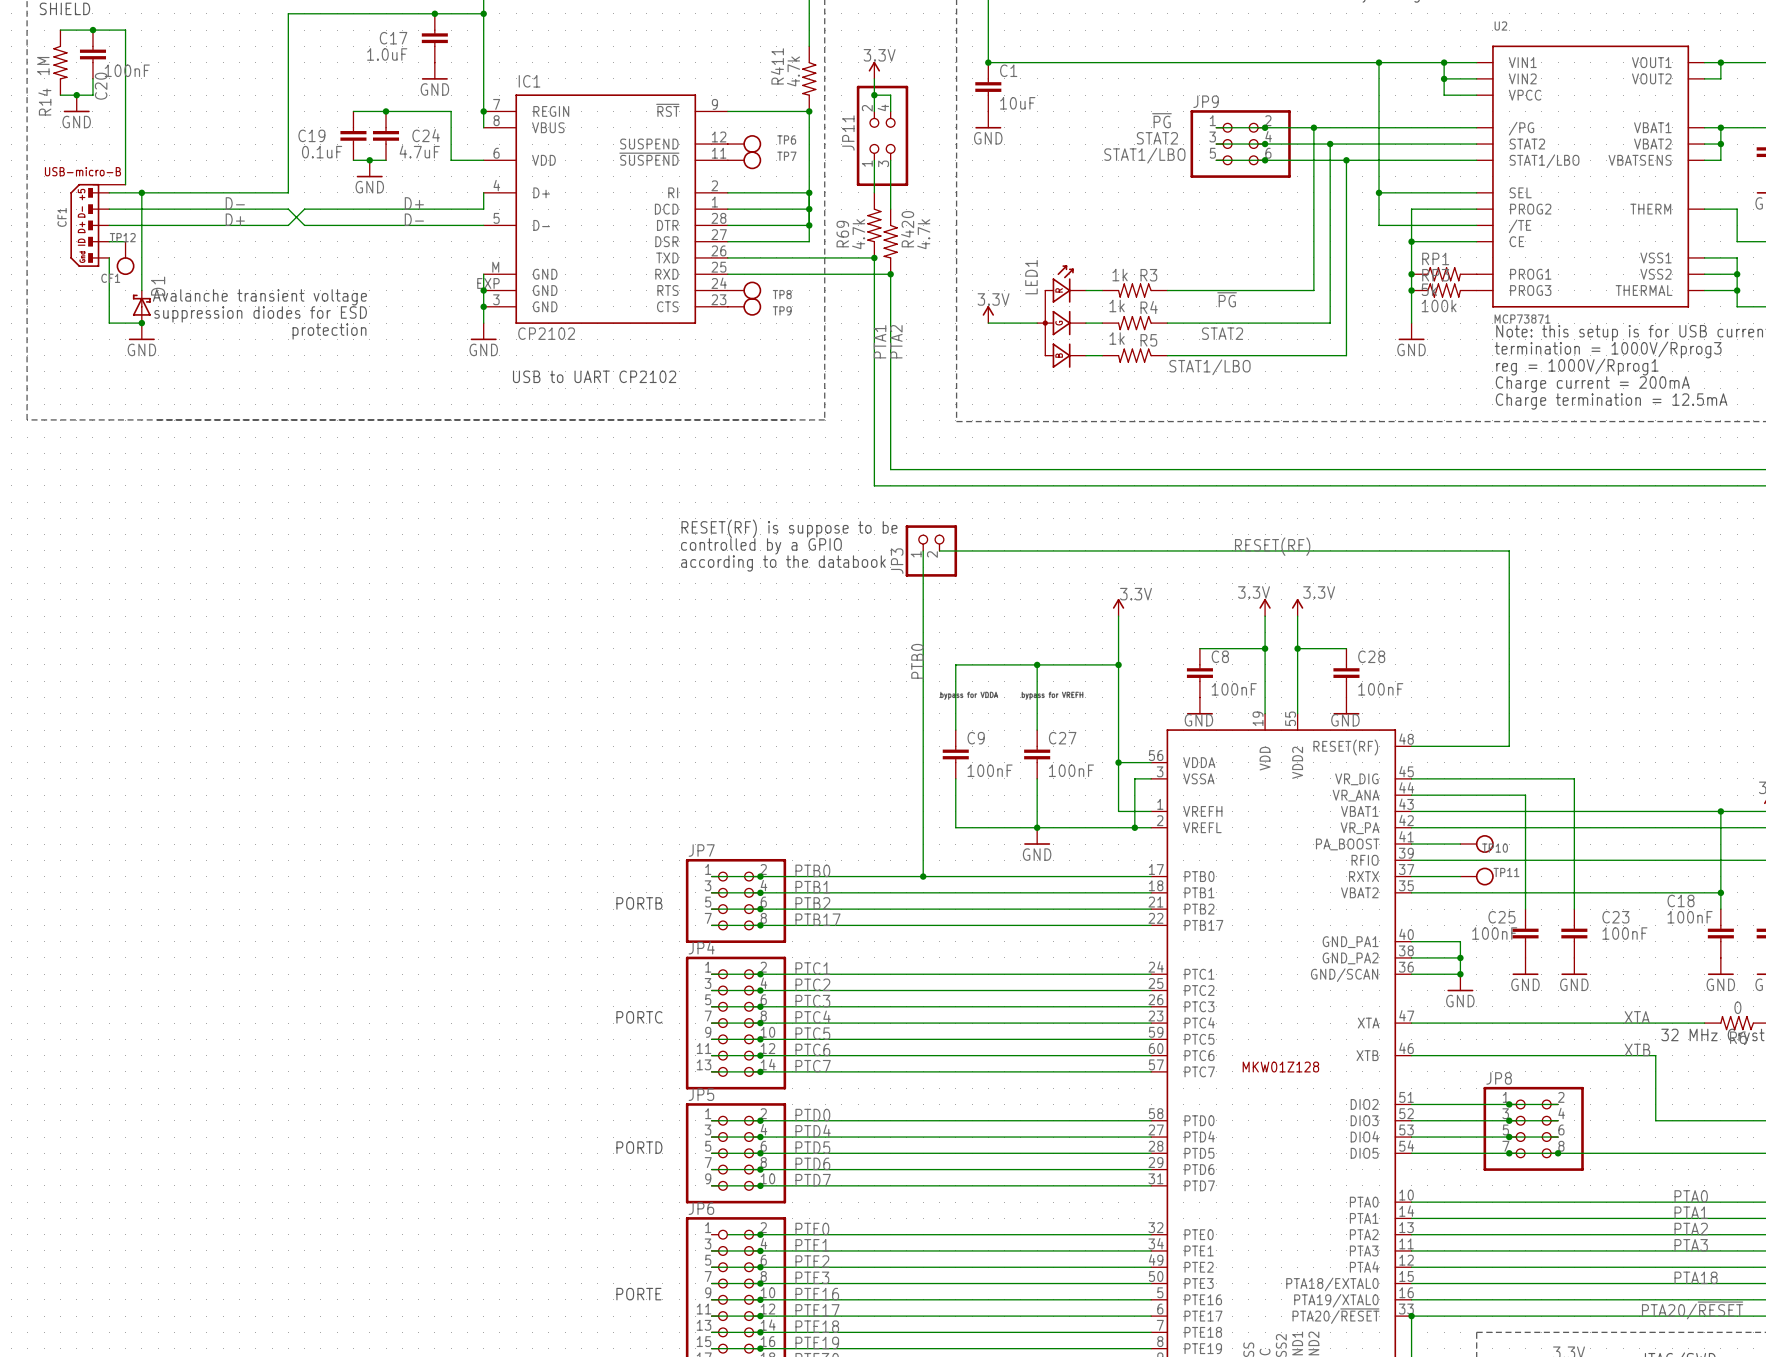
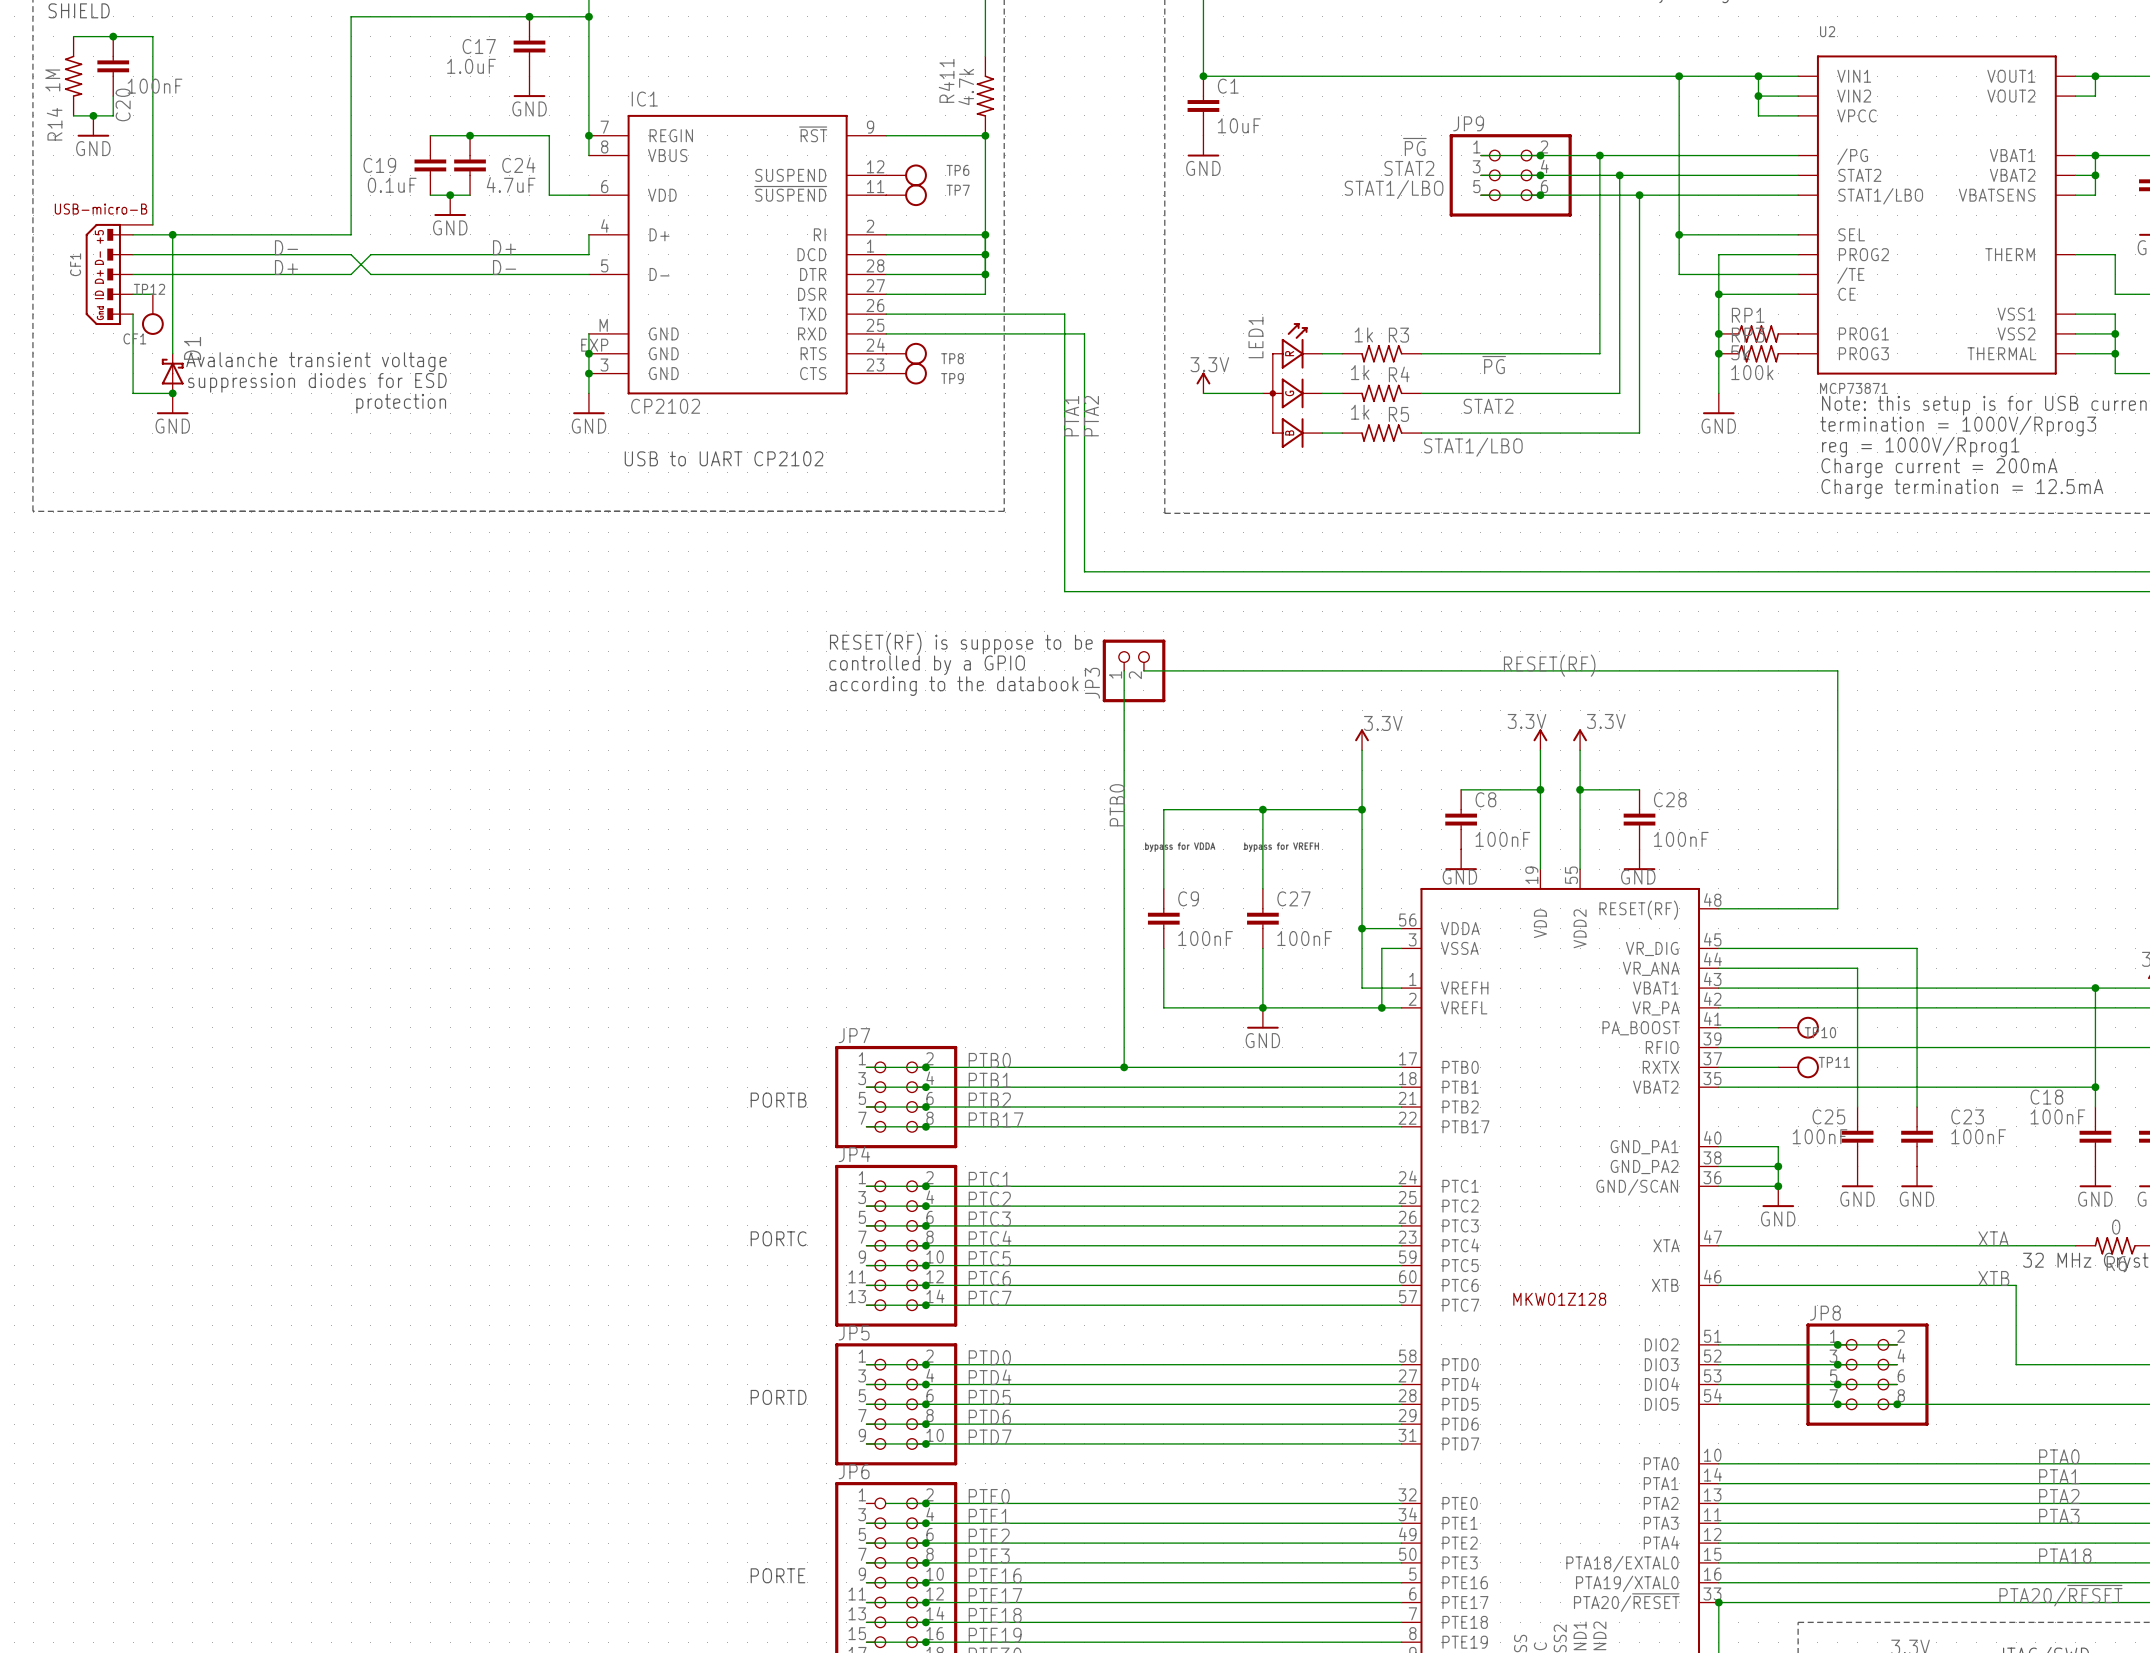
power symbol: 3.3V (874, 70) -> none
wire: (874, 78) (874, 111) -> none
wire: (874, 95) (890, 95) (890, 111) -> none
junction: (874, 95) -> none
JP11: (882, 135) -> none
wire: (874, 160) (874, 192) -> none
wire: (890, 160) (890, 209) -> none
R69: 4.7k (874, 225) -> none
R420: 4.7k (890, 241) -> none
junction: (874, 257) -> none
junction: (890, 274) -> none

